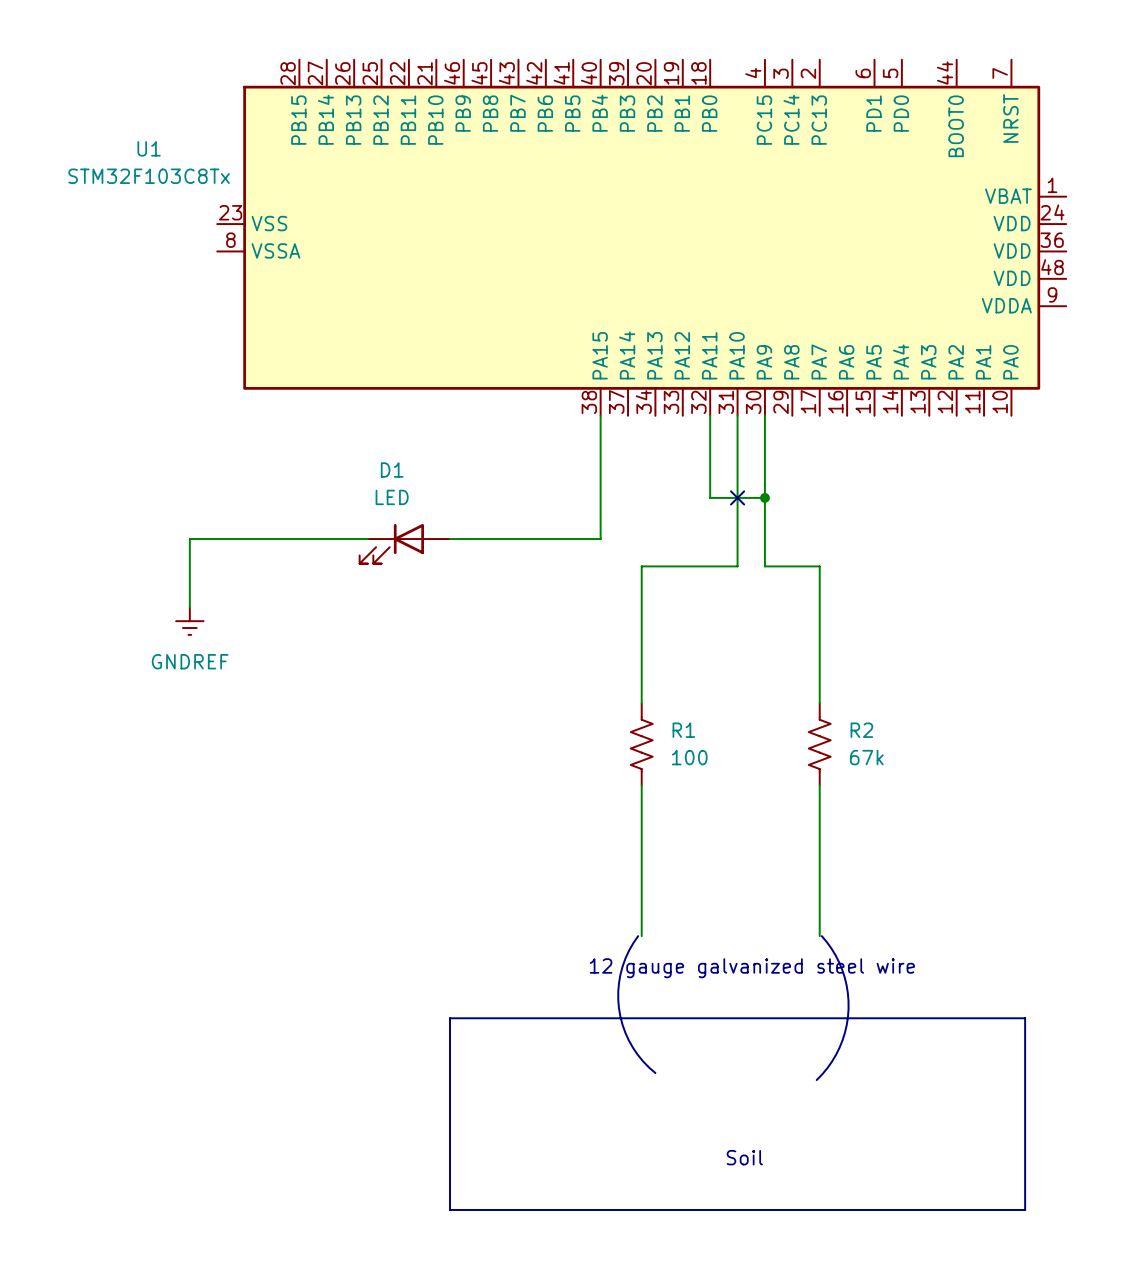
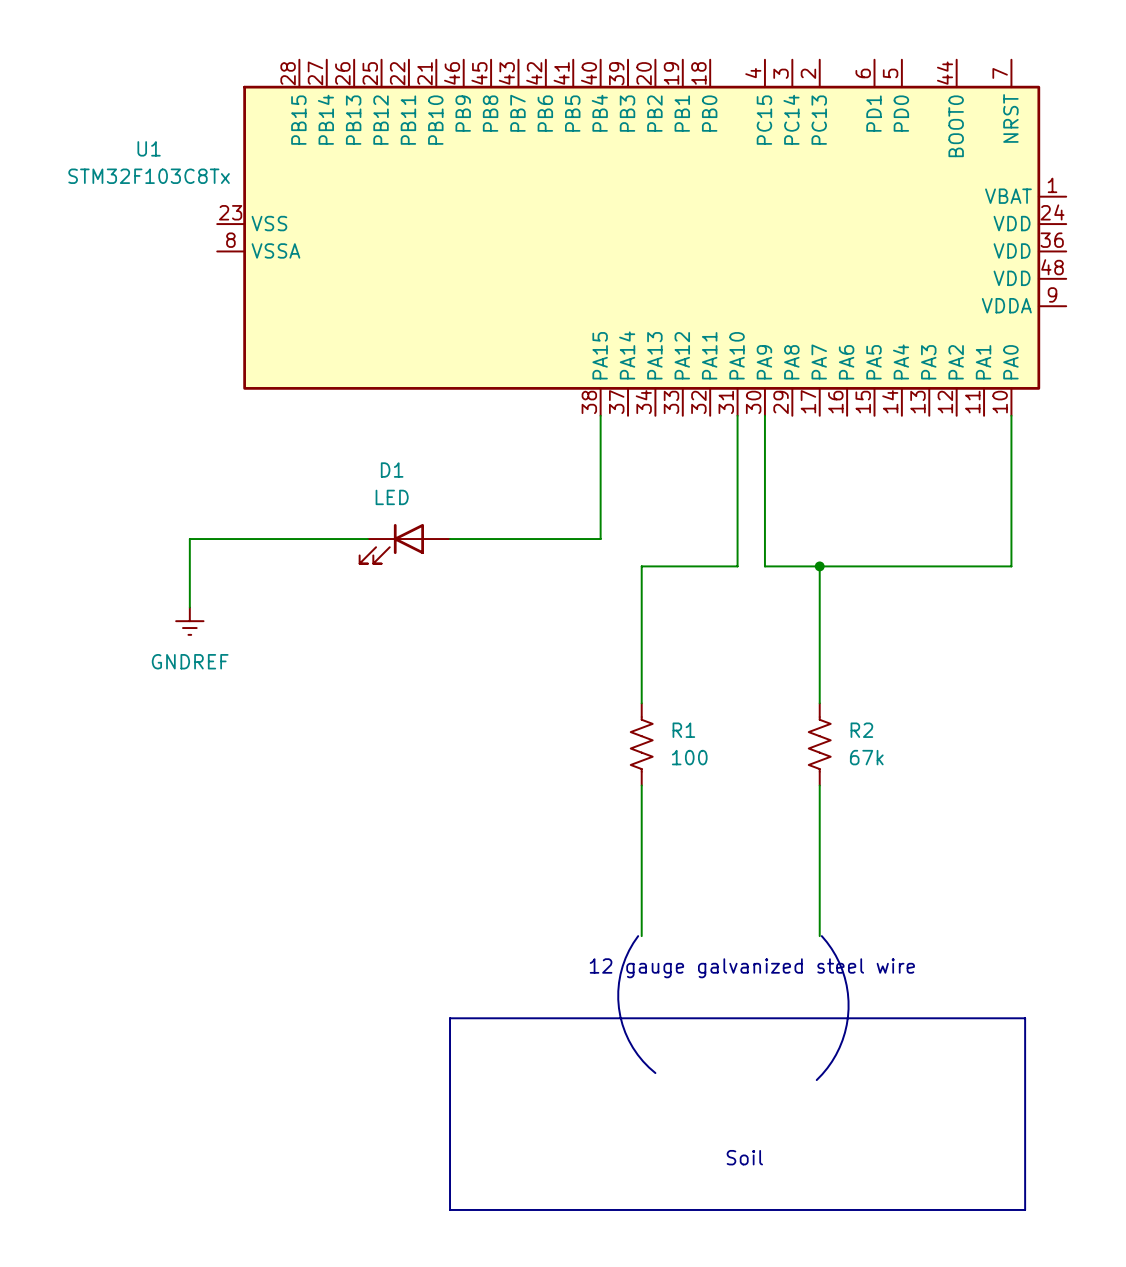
wire: (710, 415) (710, 497) (764, 497) -> none
wire: none -> (1011, 415) (1011, 566) (819, 566)
no-connect mark: (737, 497) -> none
junction: (764, 497) -> none
junction: none -> (819, 566)

